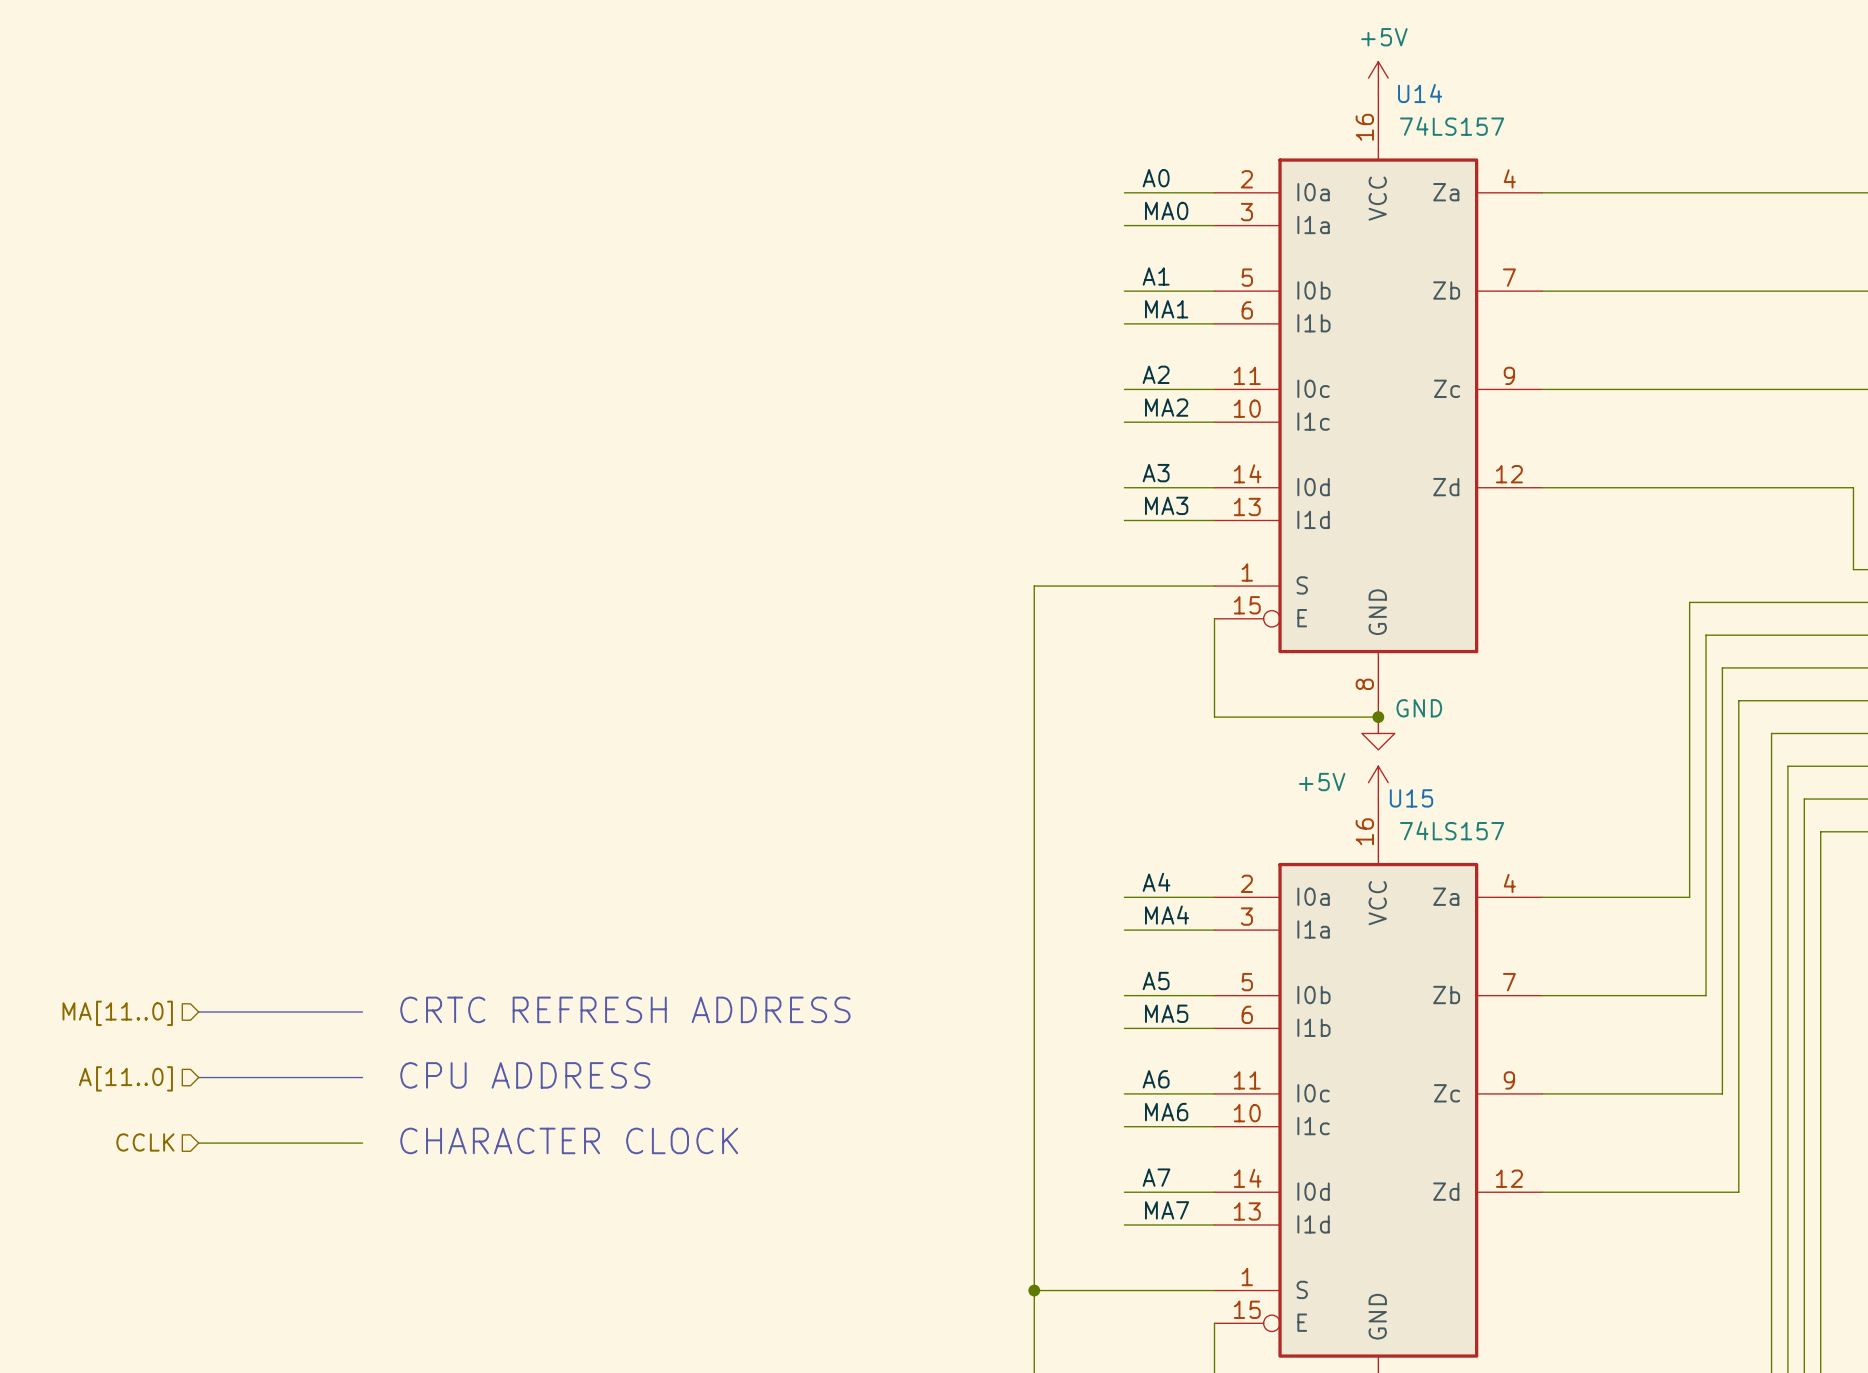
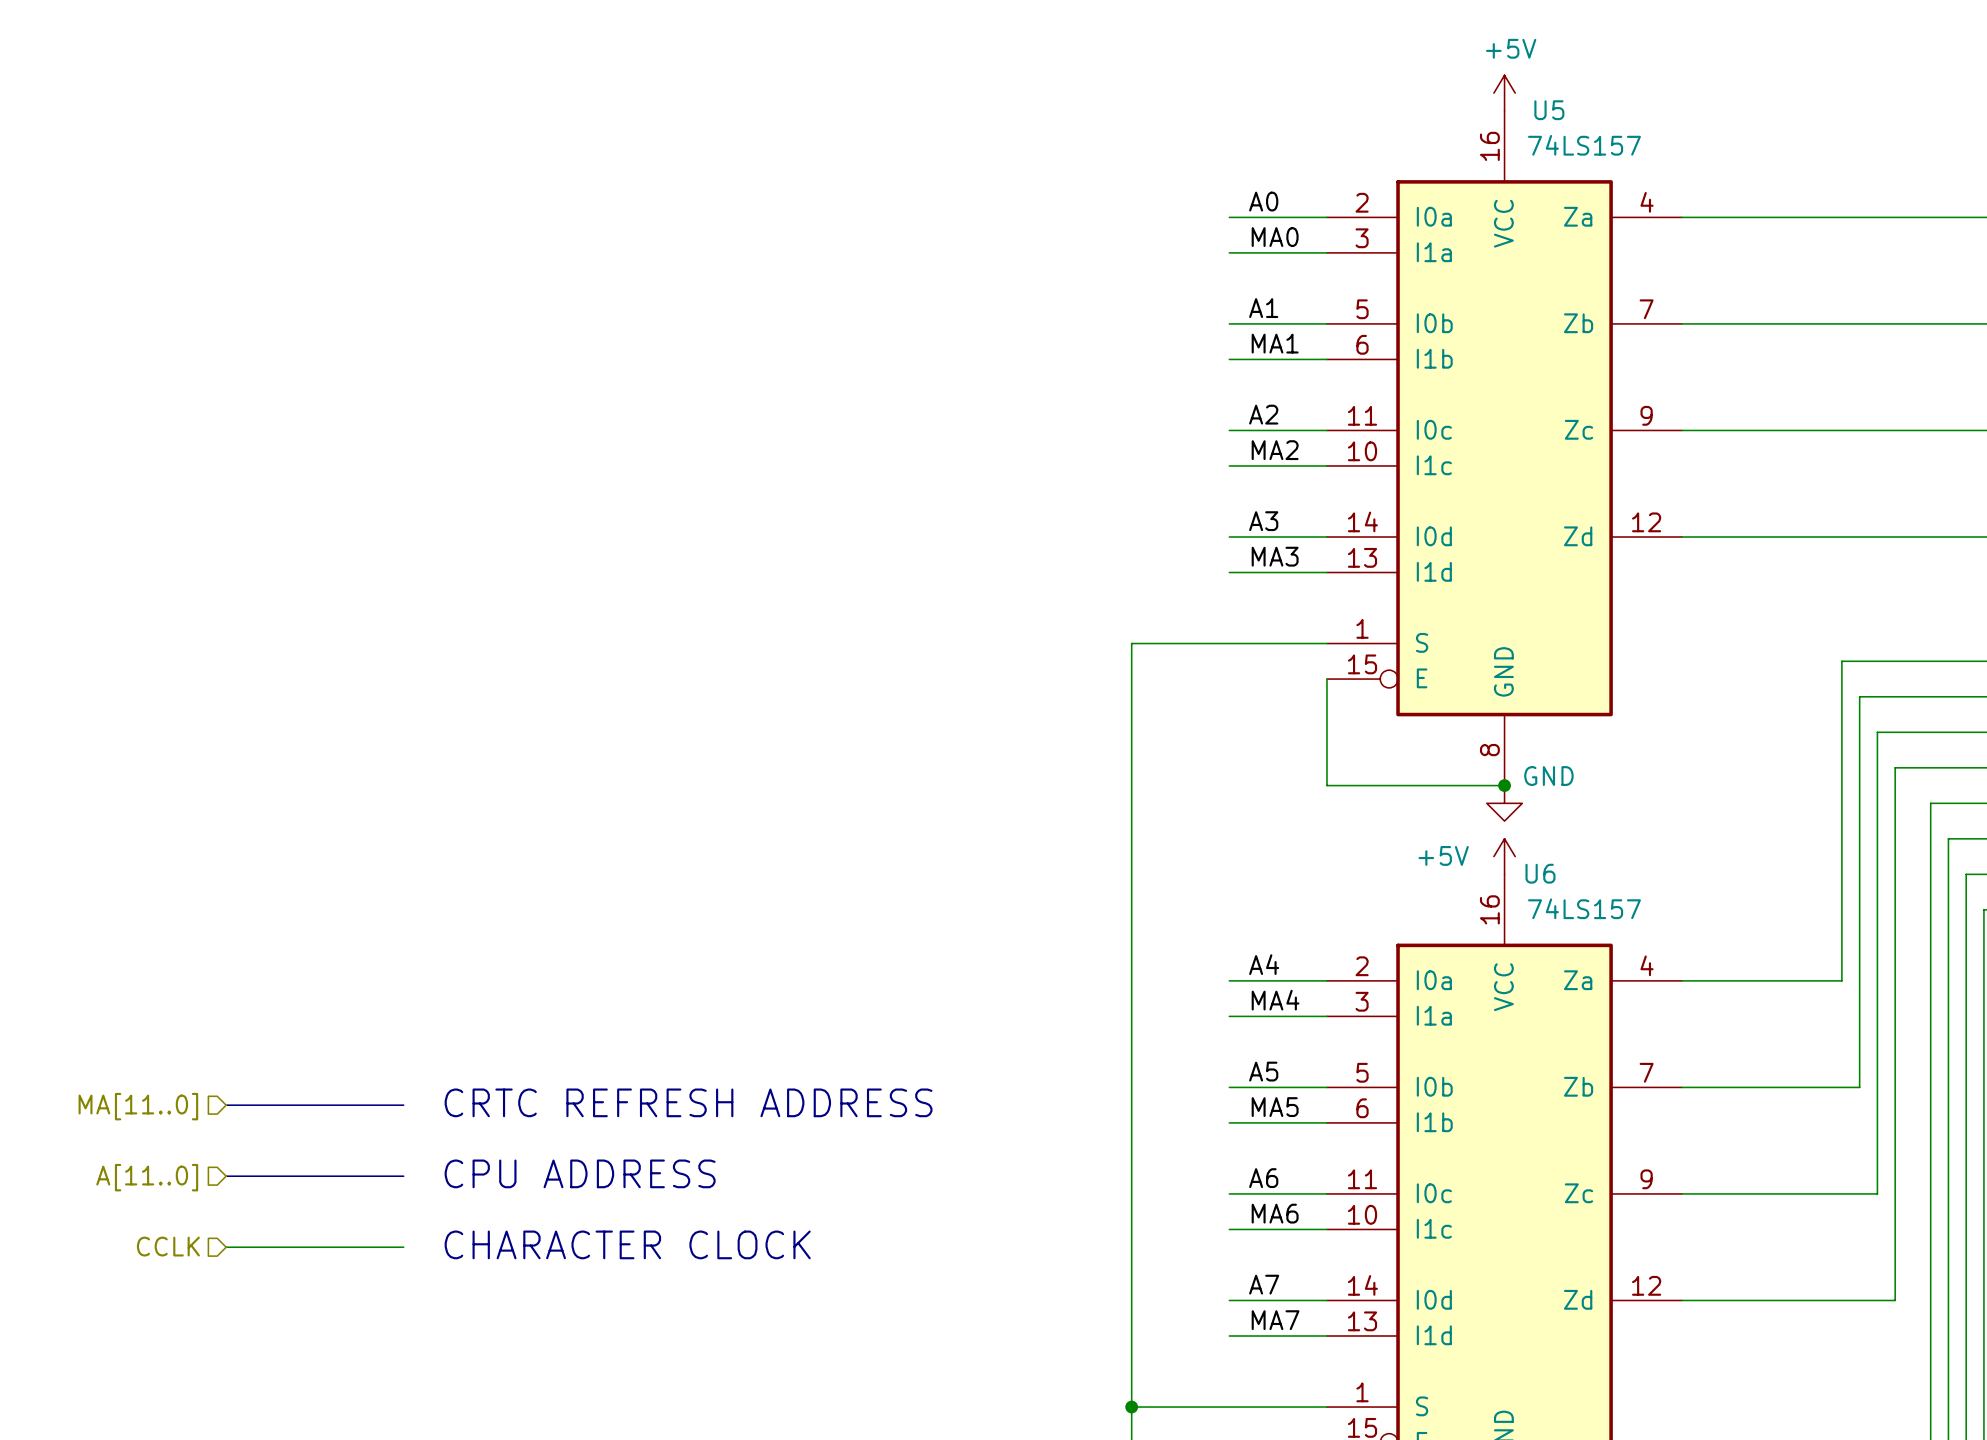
U14 name: U14 (1420, 93) -> U5 (1549, 110)
U15 name: U15 (1411, 798) -> U6 (1540, 873)

